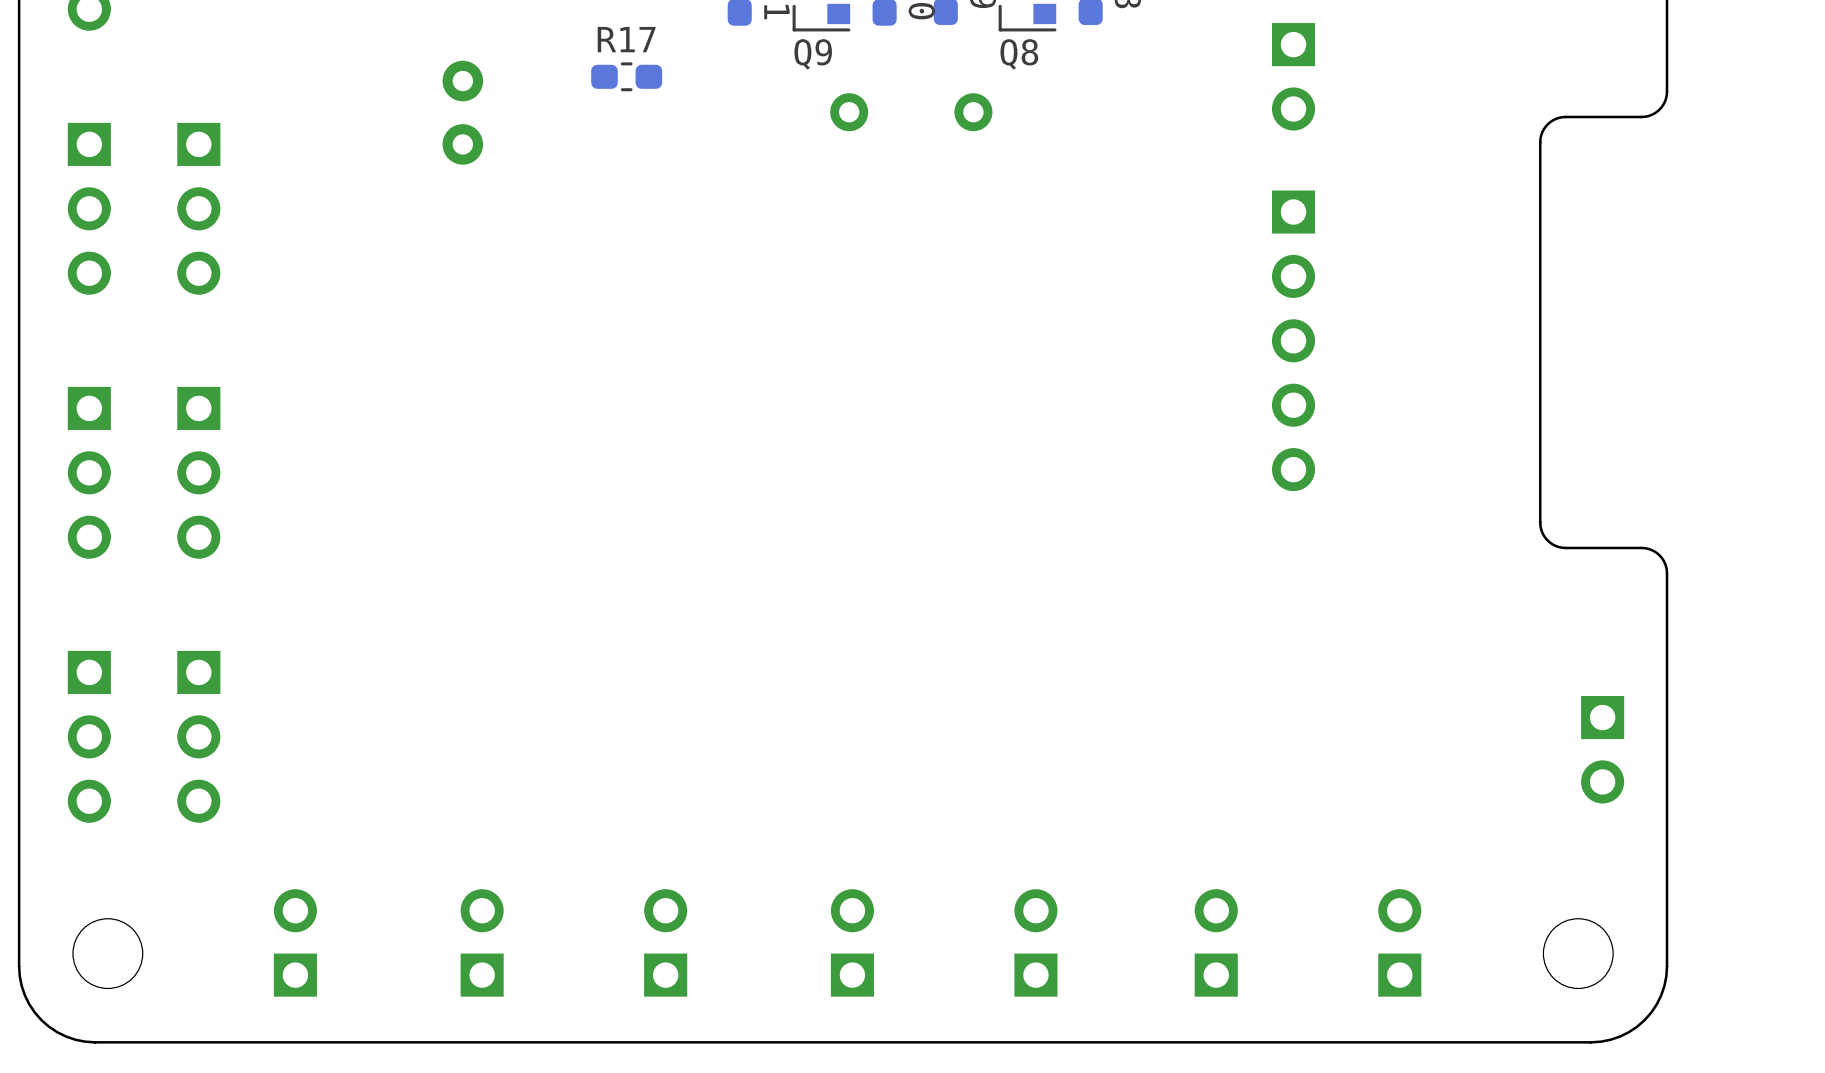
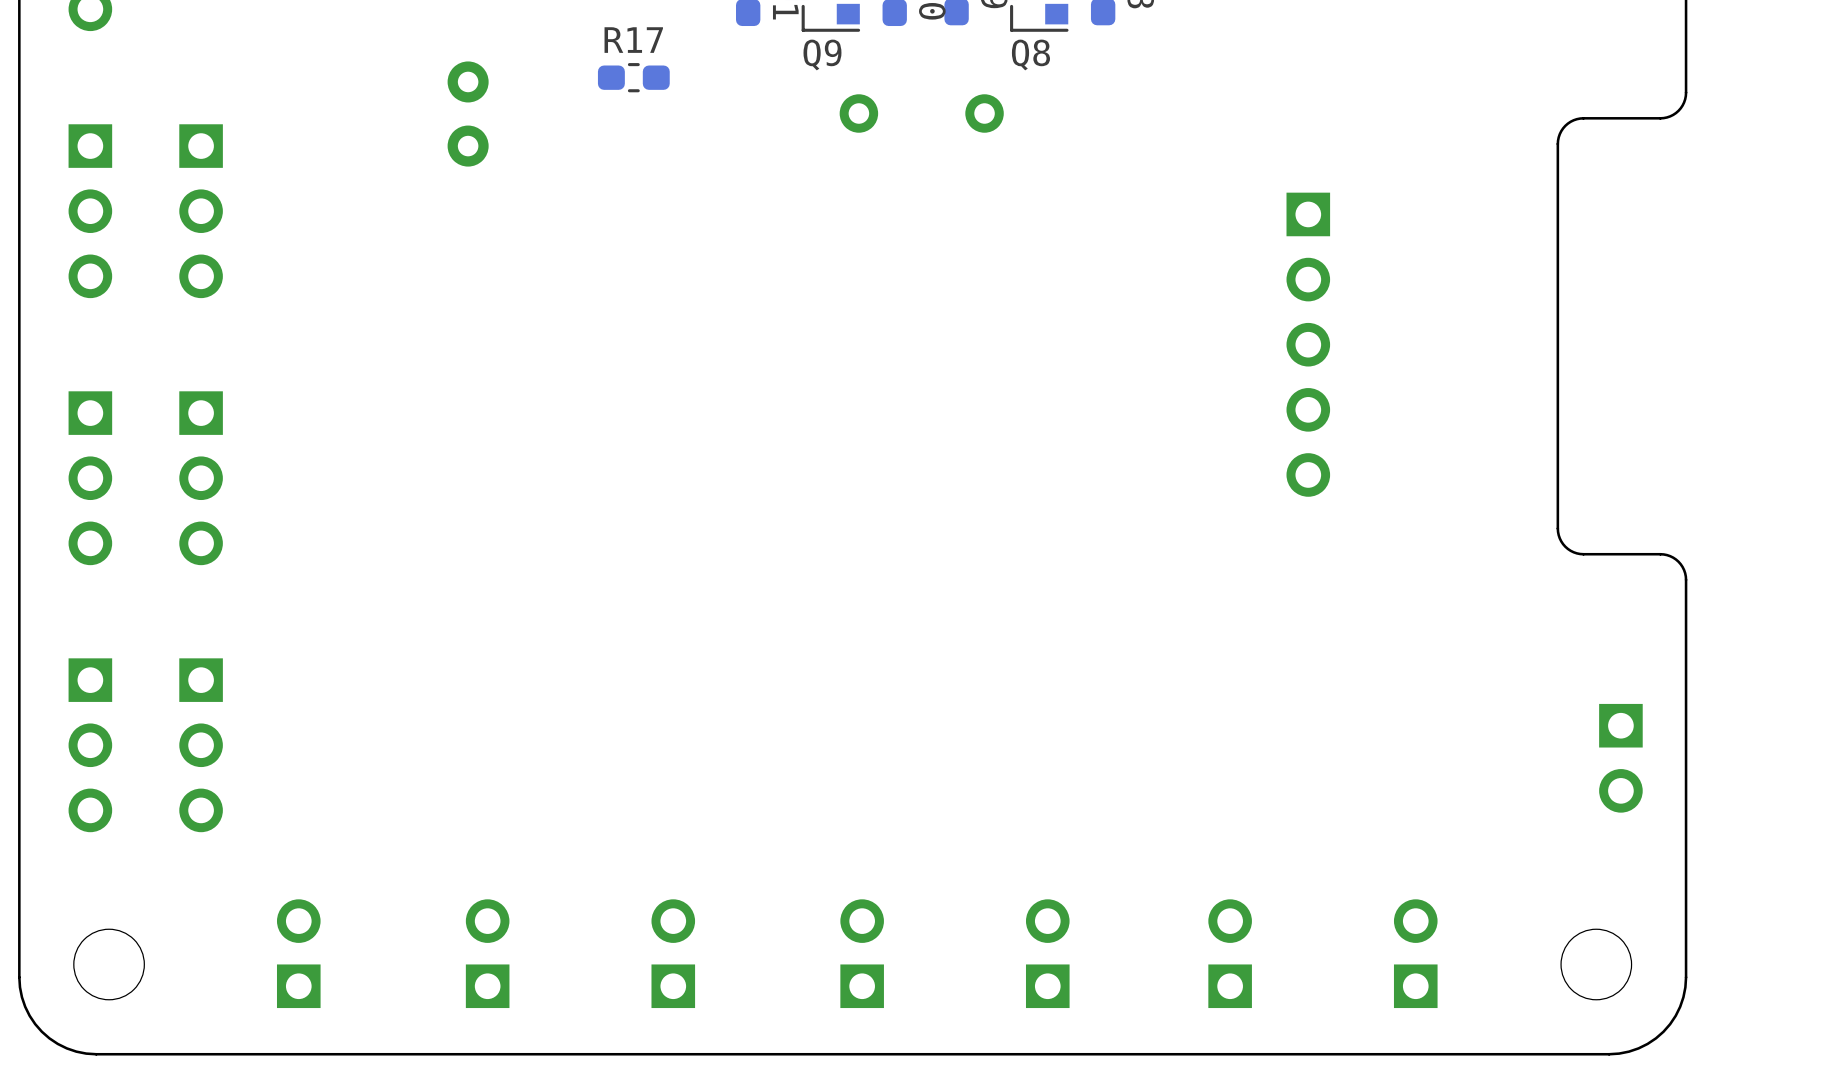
part: (1293, 76) -> none

